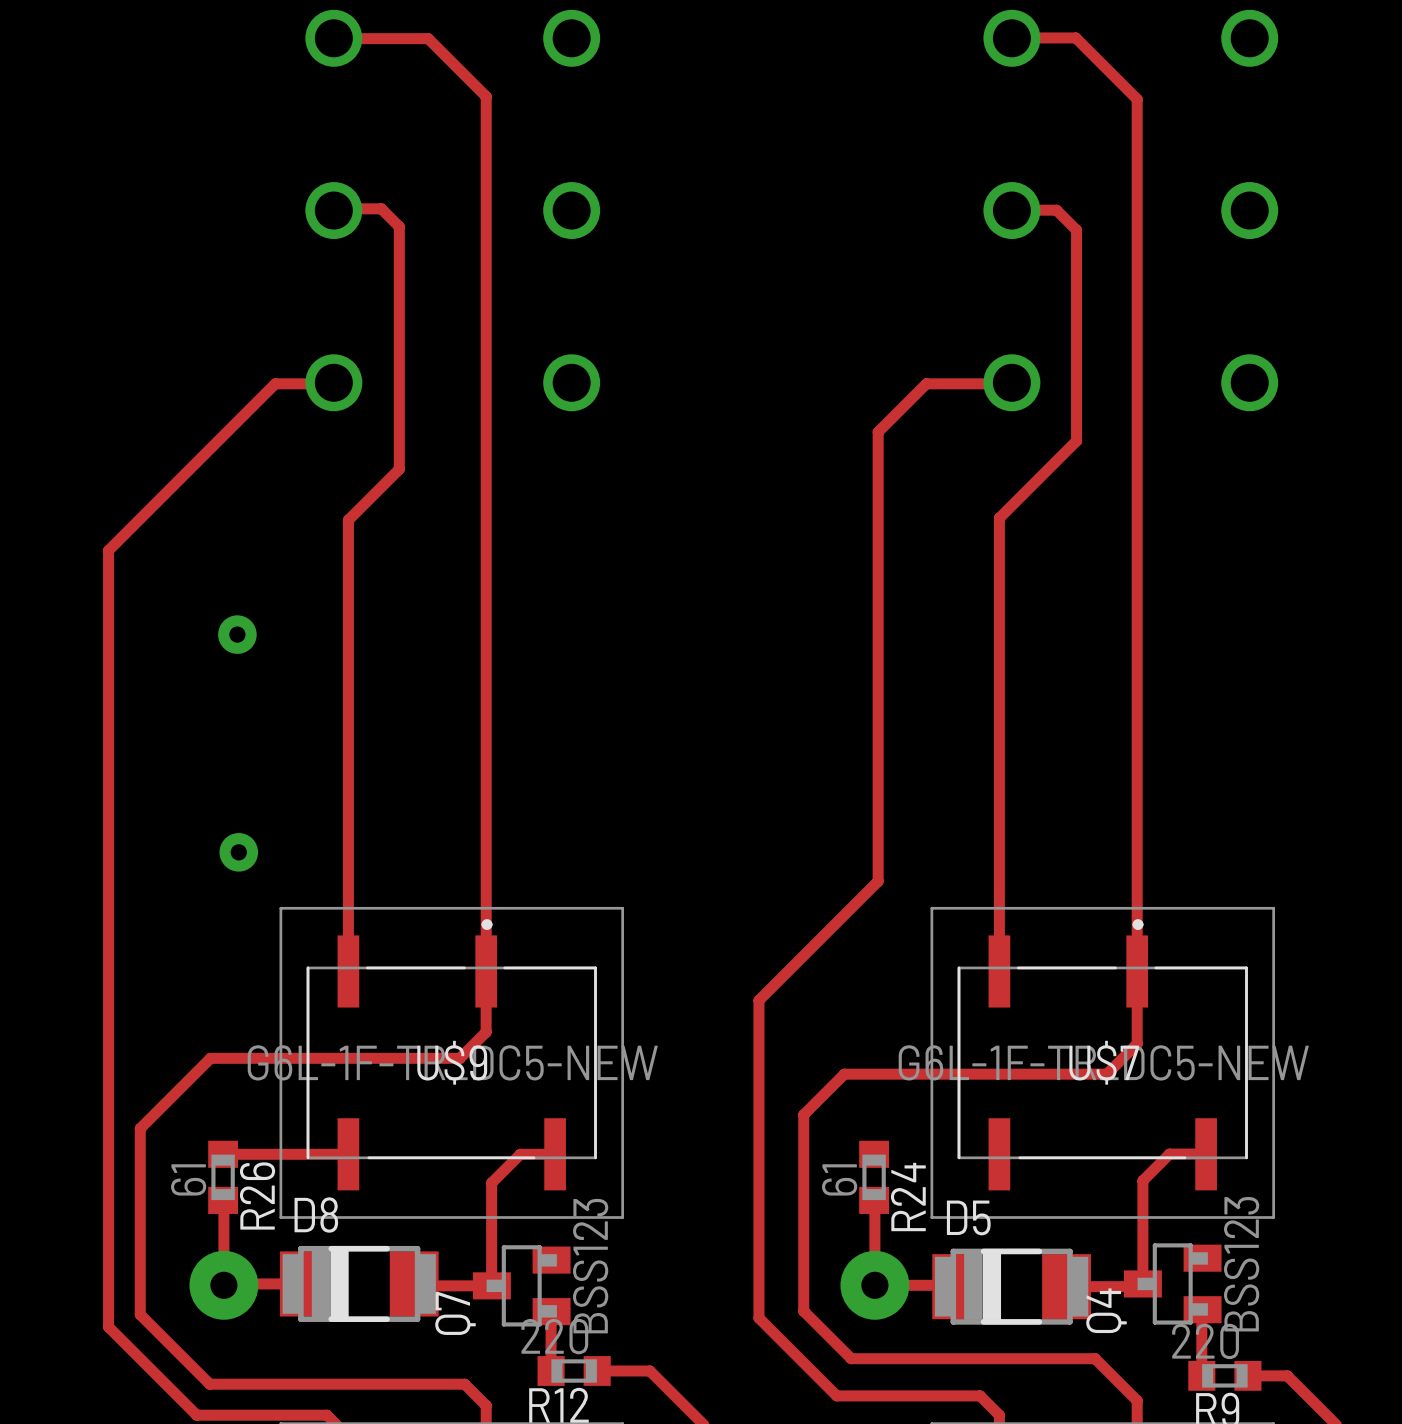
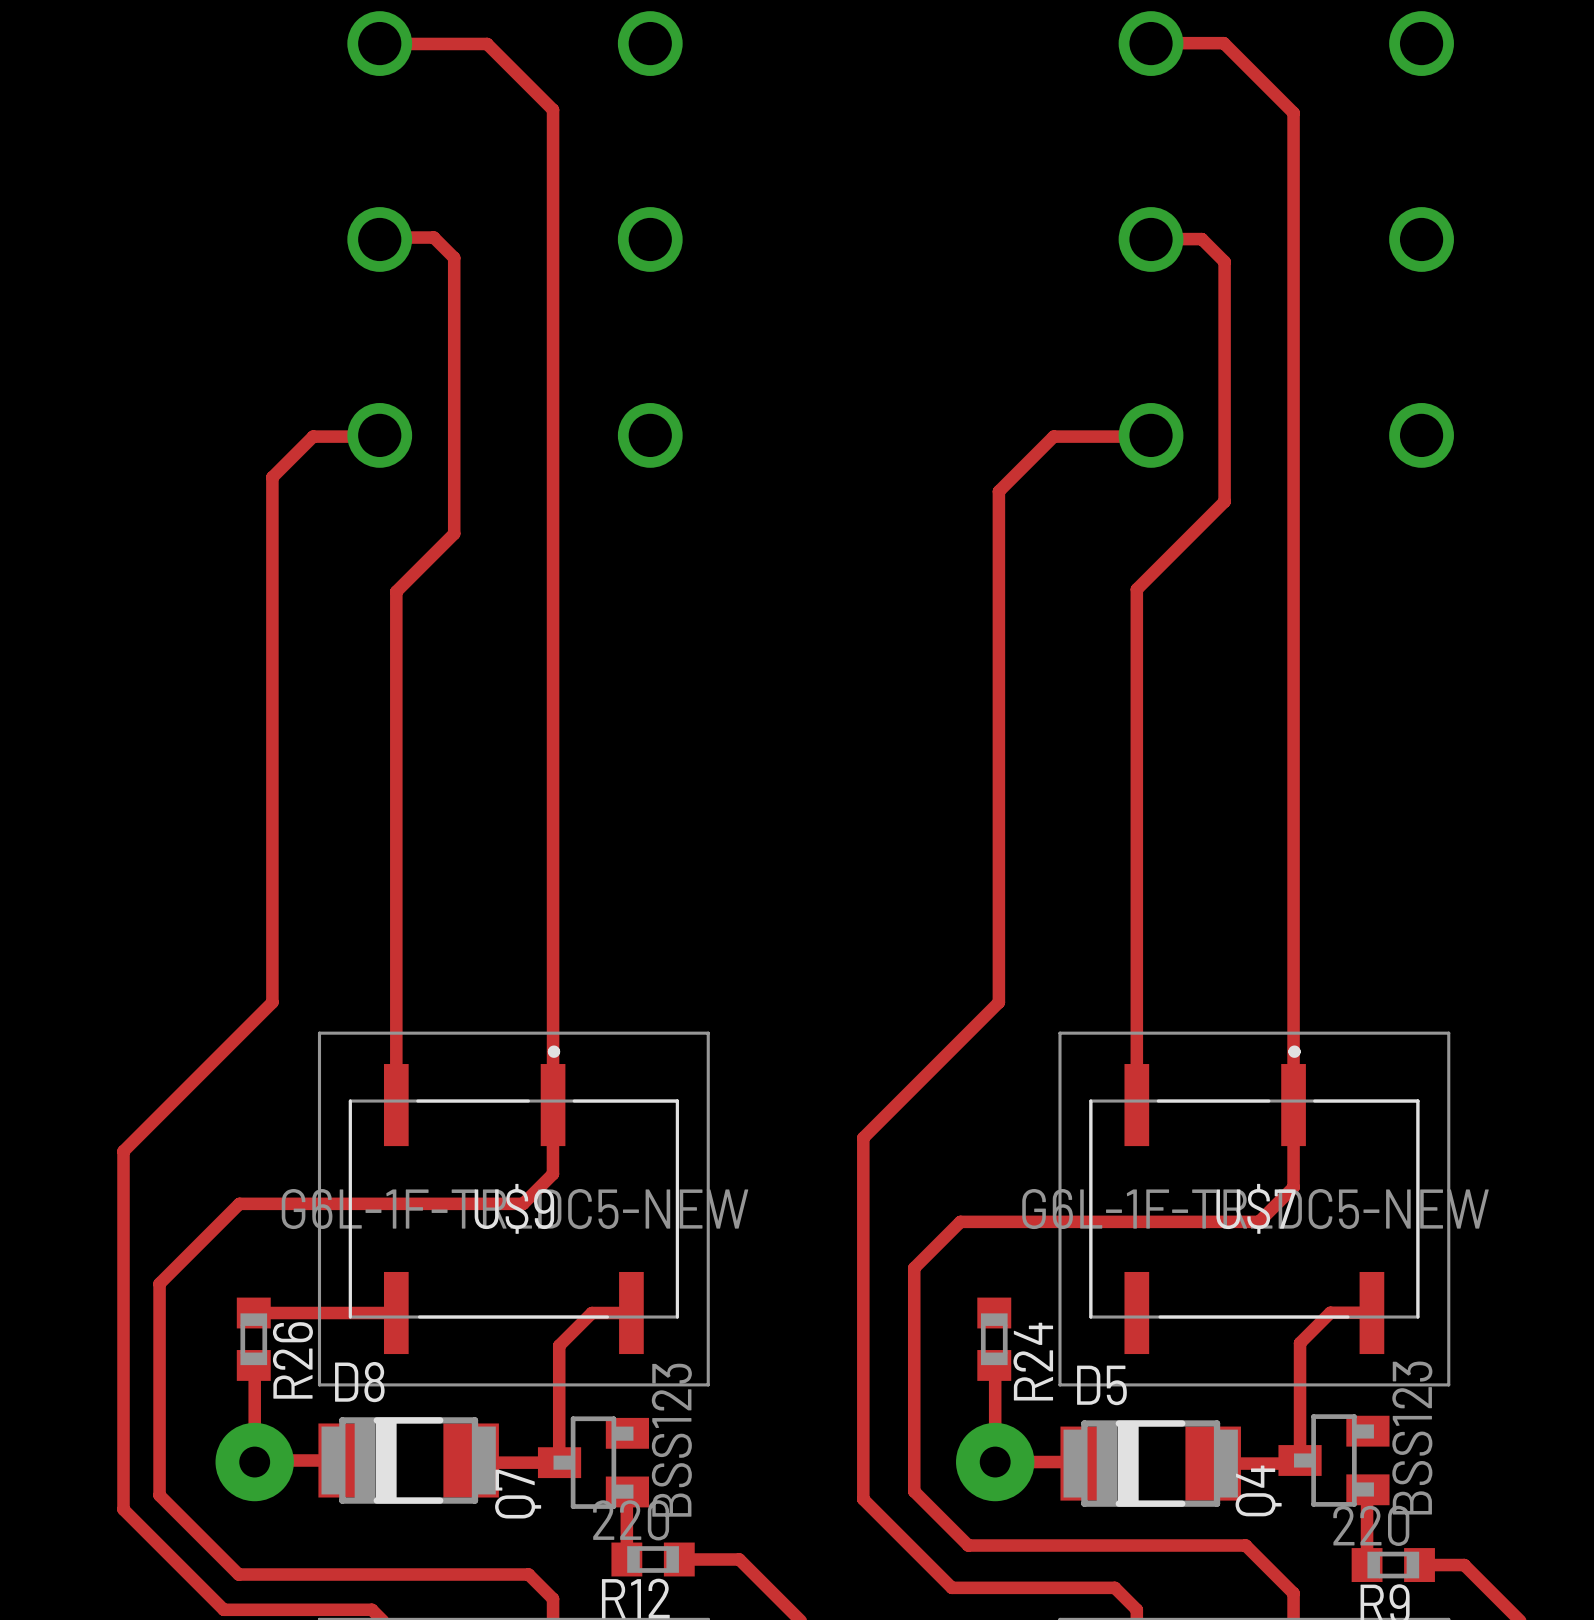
track: (239, 419) (108, 550) (108, 1012) -> (272, 477) (272, 1002) (123, 1151)
via: (237, 634) -> none
via: (238, 852) -> none
R26 value: 61 (188, 1179) -> none
R24 value: 61 (839, 1179) -> none

